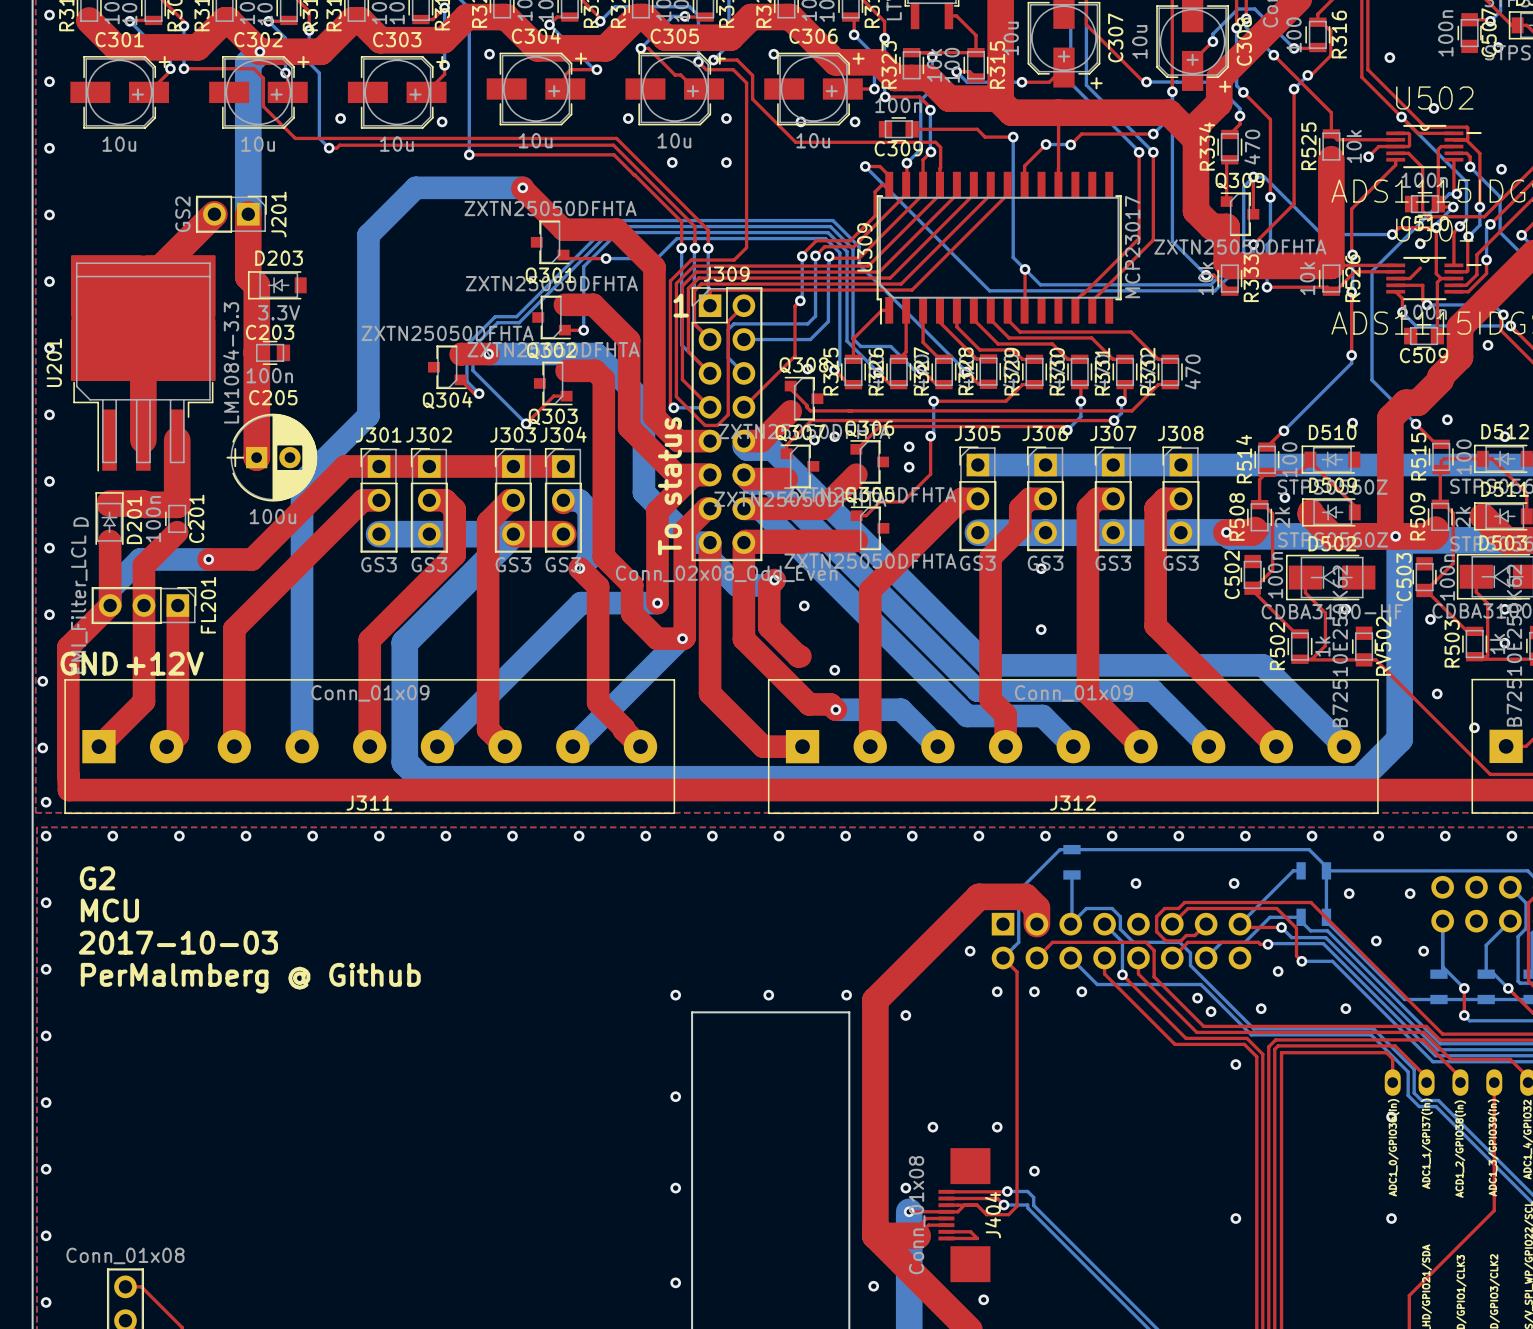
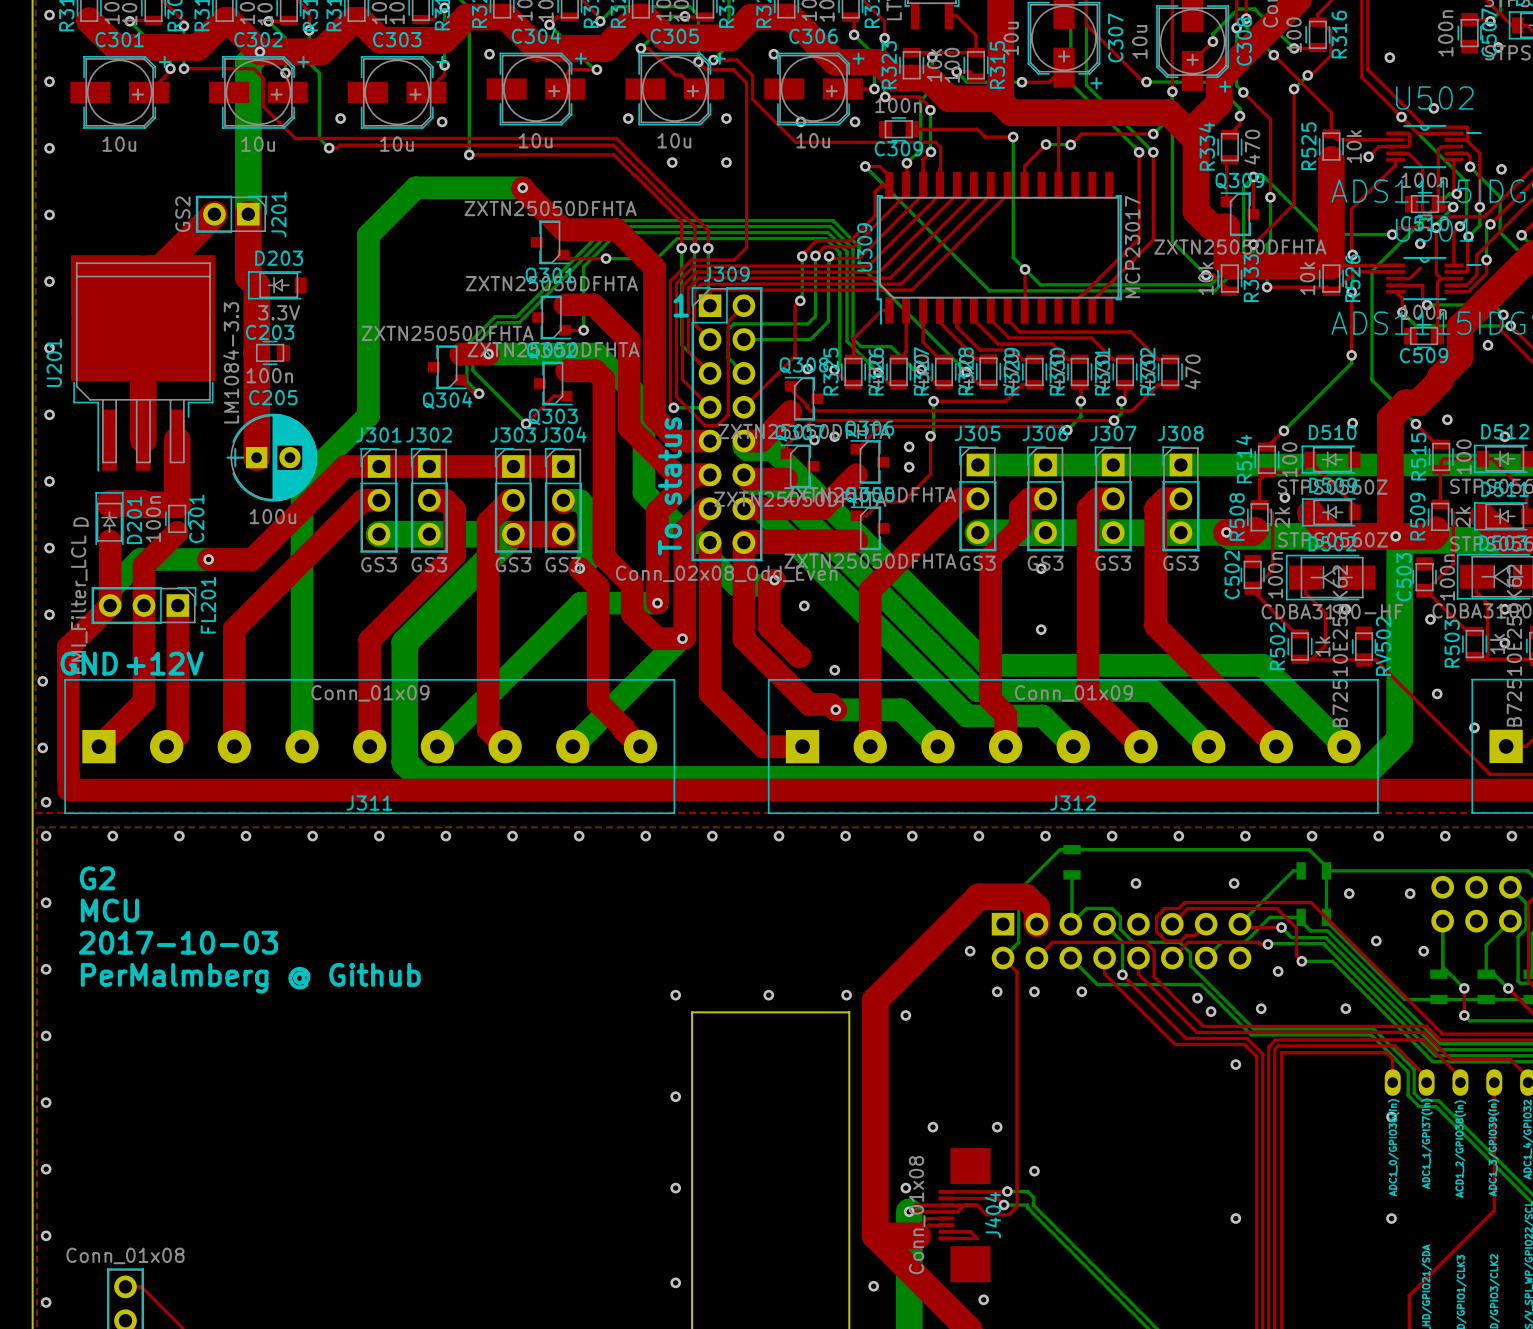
top track: none -> (946, 1205) (915, 1205) (909, 1211)

